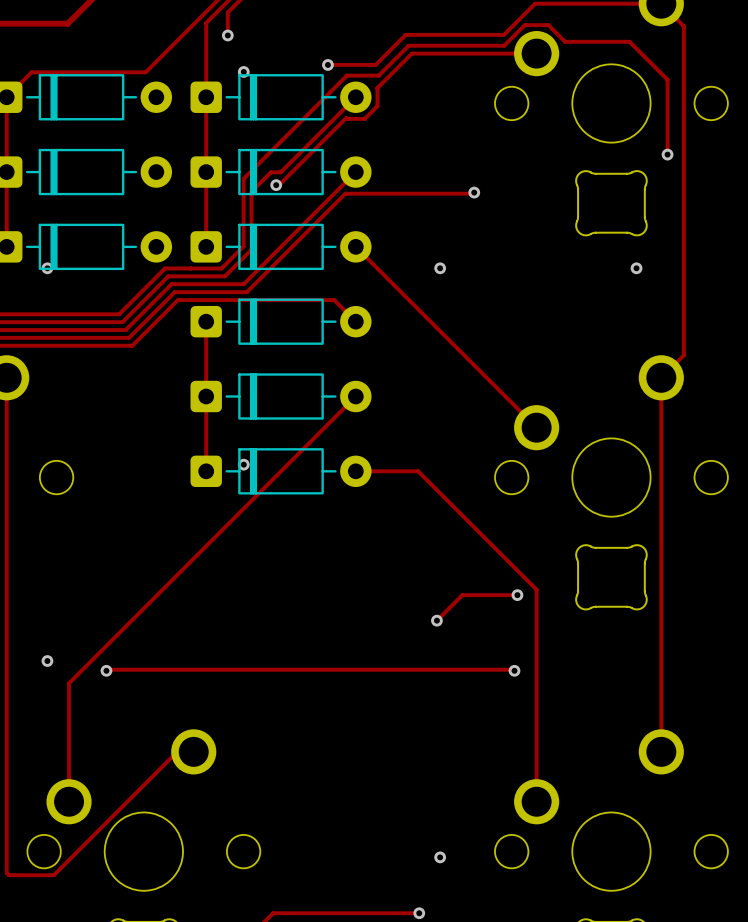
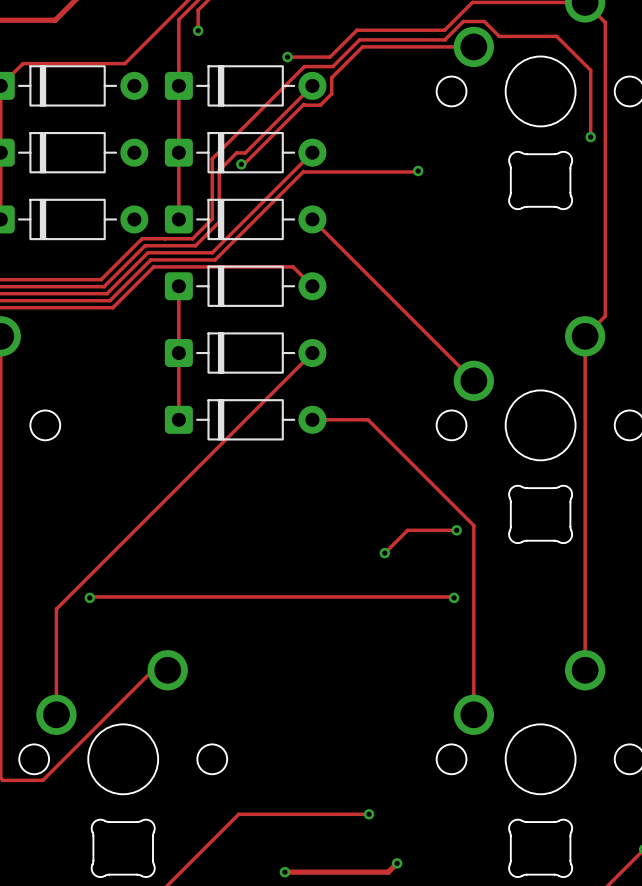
via: (243, 71) -> none
via: (47, 268) -> none
via: (440, 268) -> none
via: (636, 268) -> none
via: (243, 464) -> none
via: (47, 661) -> none
via: (440, 857) -> none

